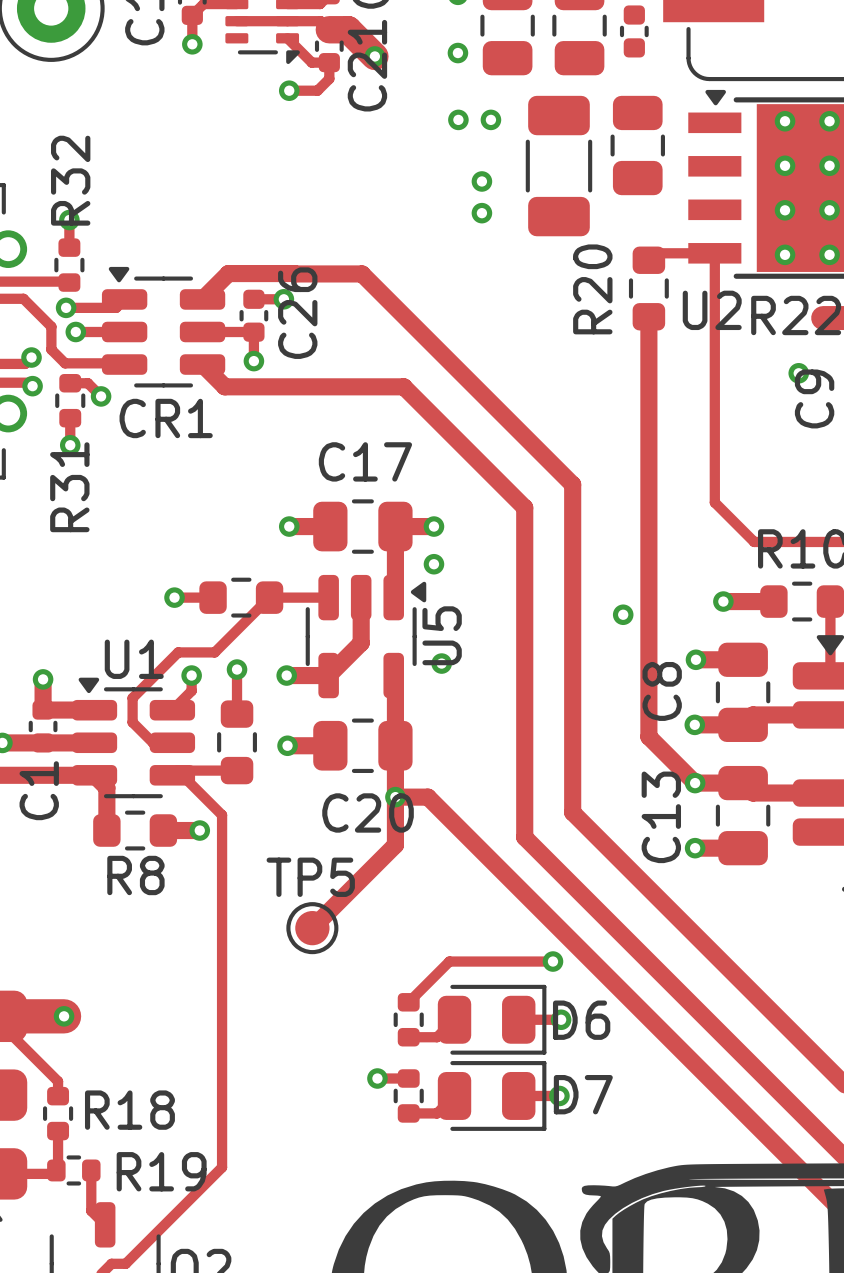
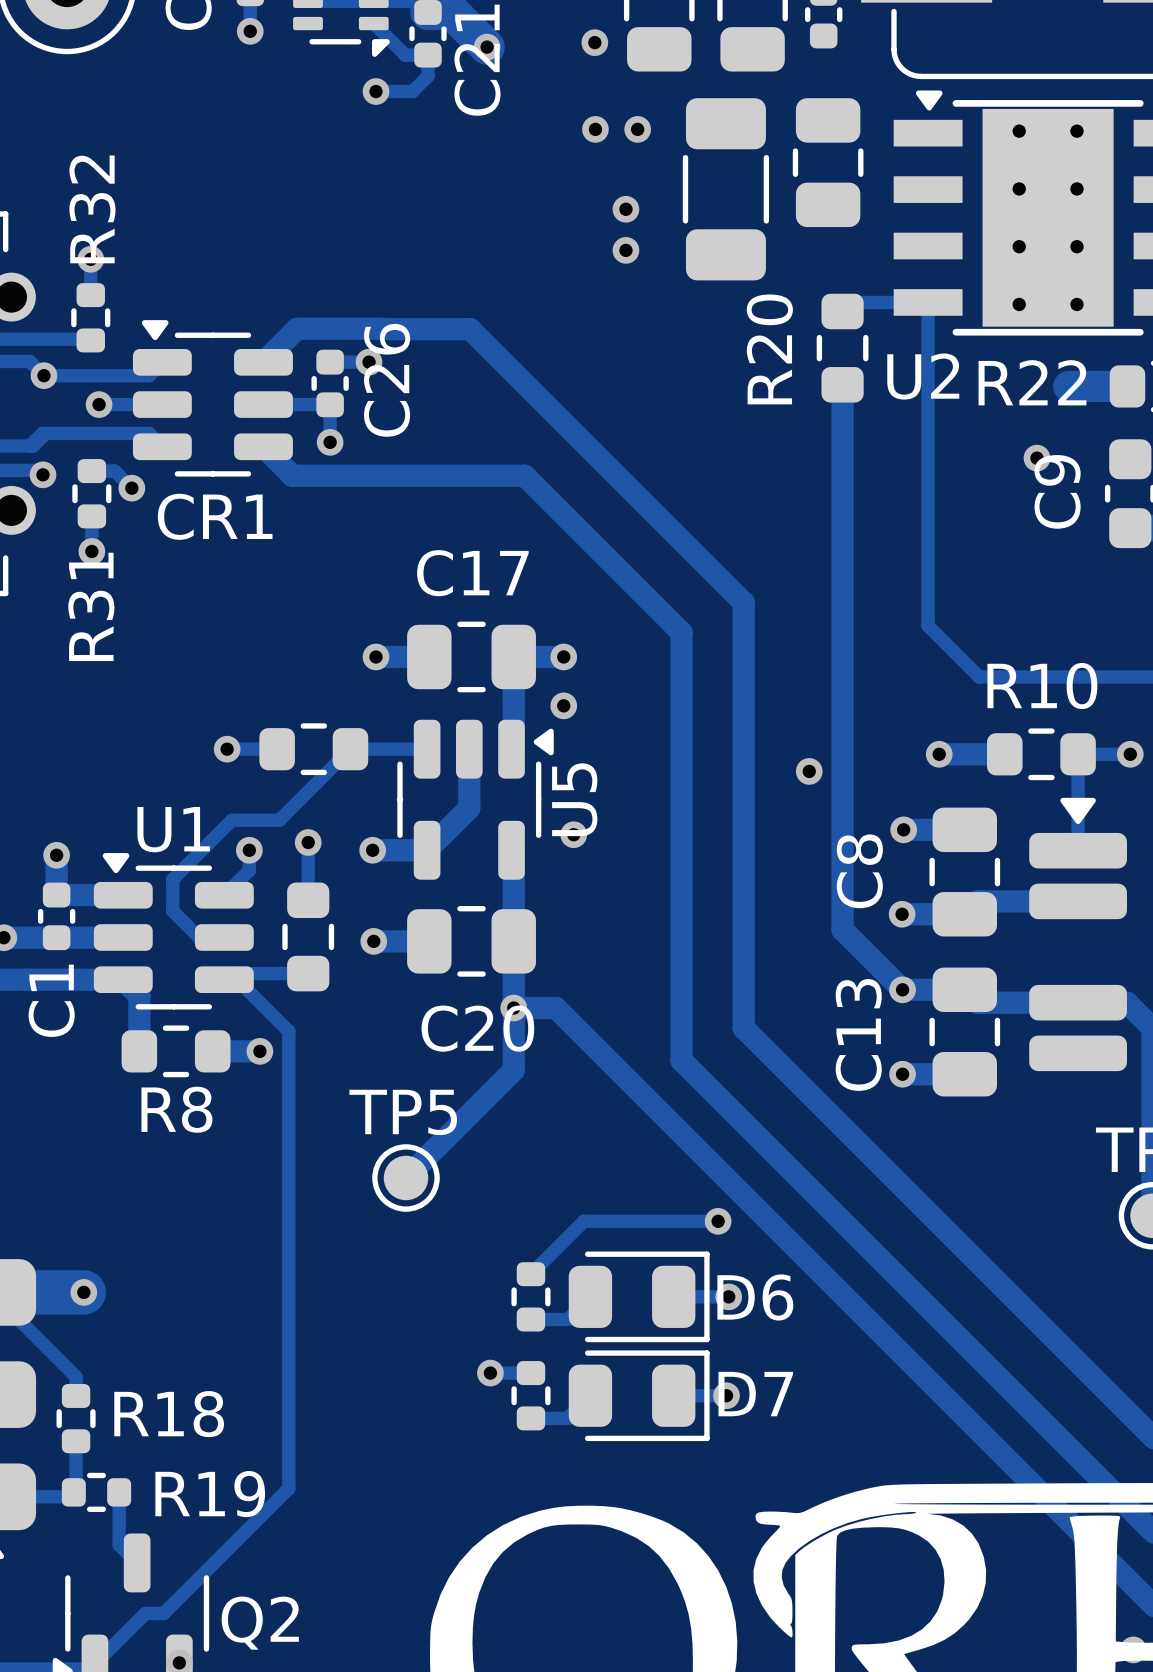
track: (22, 298) (51, 326) (51, 349) (65, 363) (123, 363) -> (29, 446) (42, 433) (149, 433) (160, 445)
track: (66, 307) (116, 307) -> (29, 361) (43, 375) (149, 375) (151, 373)
via: (66, 307) -> none
via: none -> (43, 375)
via: (31, 357) -> none

